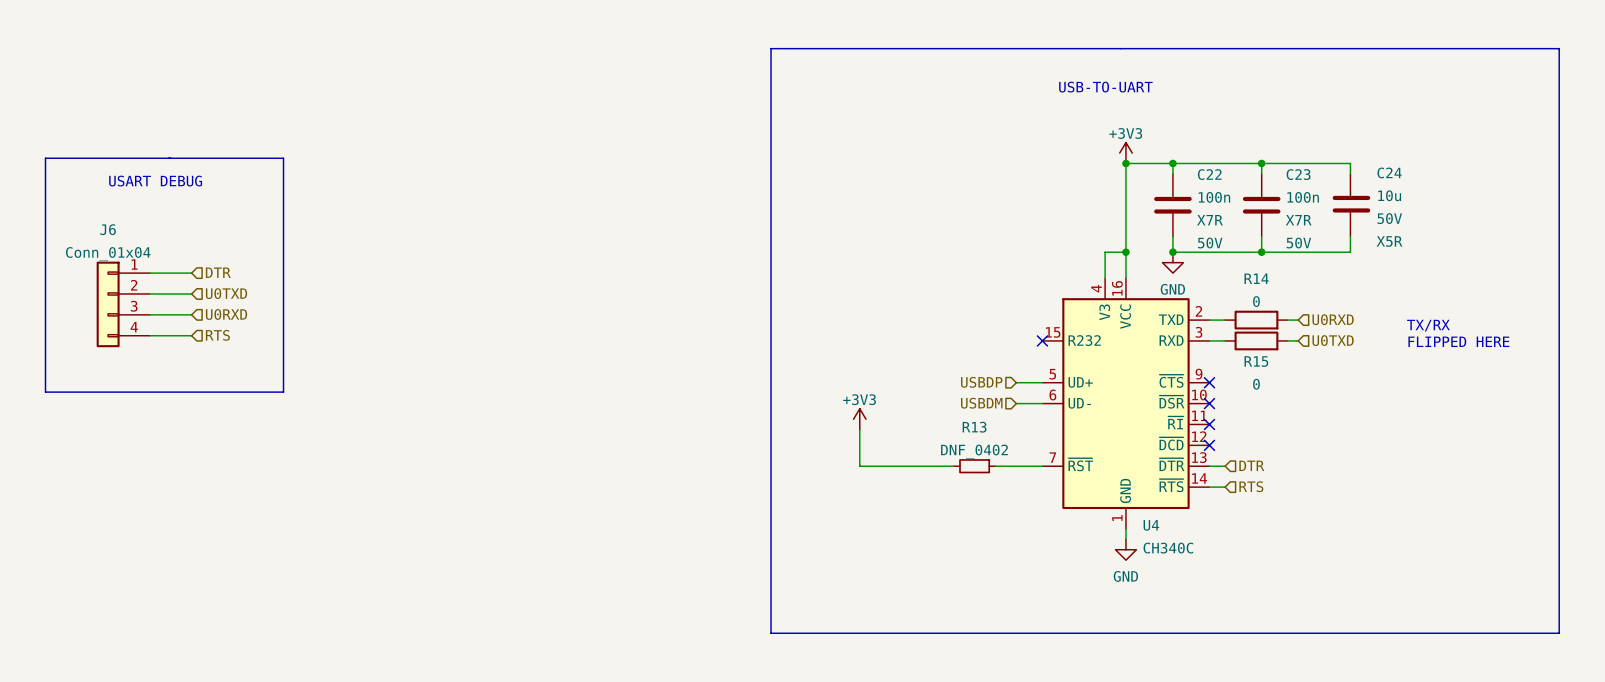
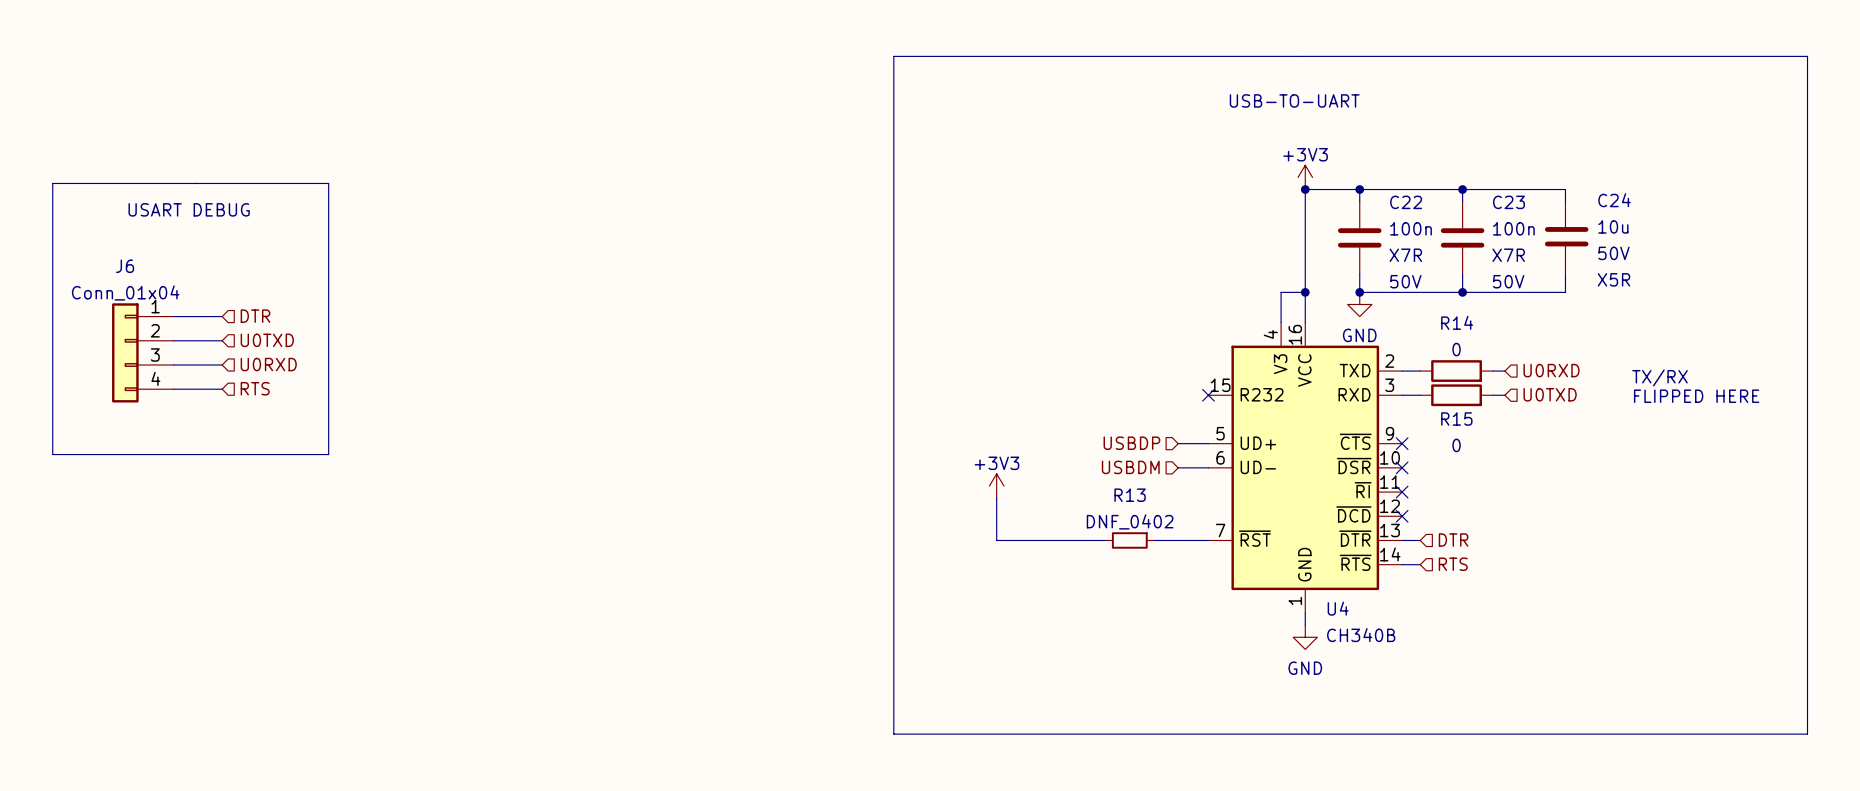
U4 value: CH340C (1168, 548) -> CH340B (1361, 635)

